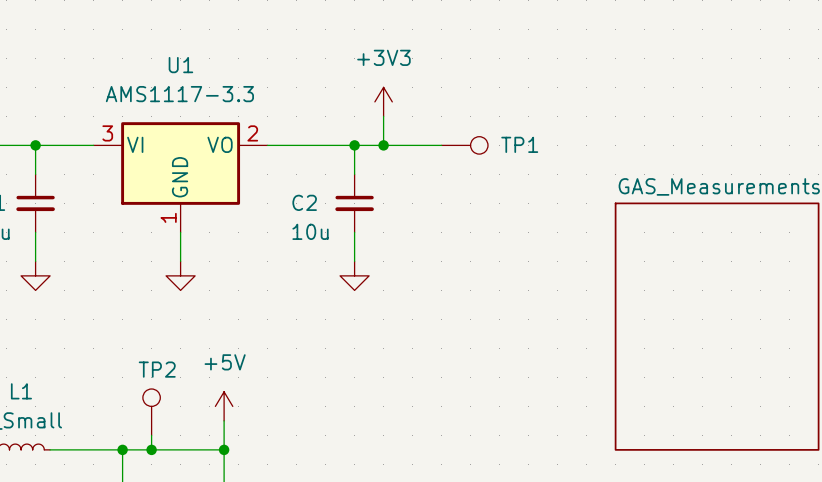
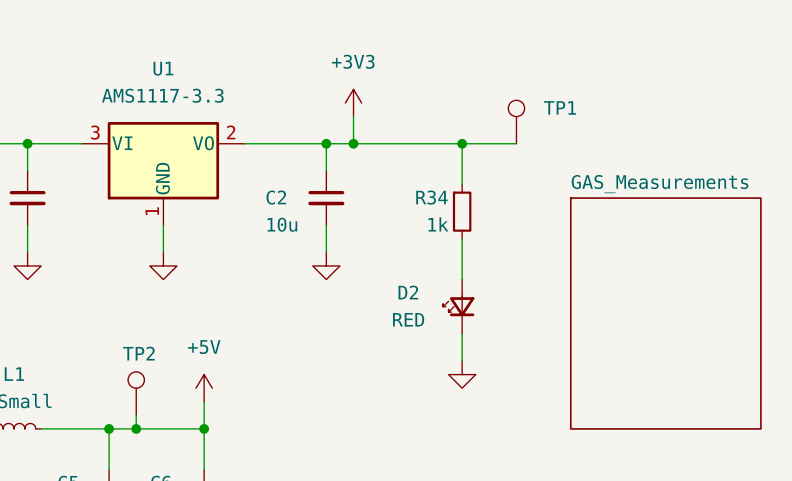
wire: none -> (407, 143) (516, 143)
TP1 position: (464, 145) -> (516, 122)
TP1 rotation: 0° (479, 145) -> 90° counterclockwise (516, 108)
wire: none -> (462, 143) (462, 184)
junction: none -> (462, 143)
R34: none -> 1k (462, 211)
wire: none -> (462, 238) (462, 279)
D2: none -> RED (458, 306)
wire: none -> (462, 333) (462, 361)
power symbol: none -> (462, 374)

